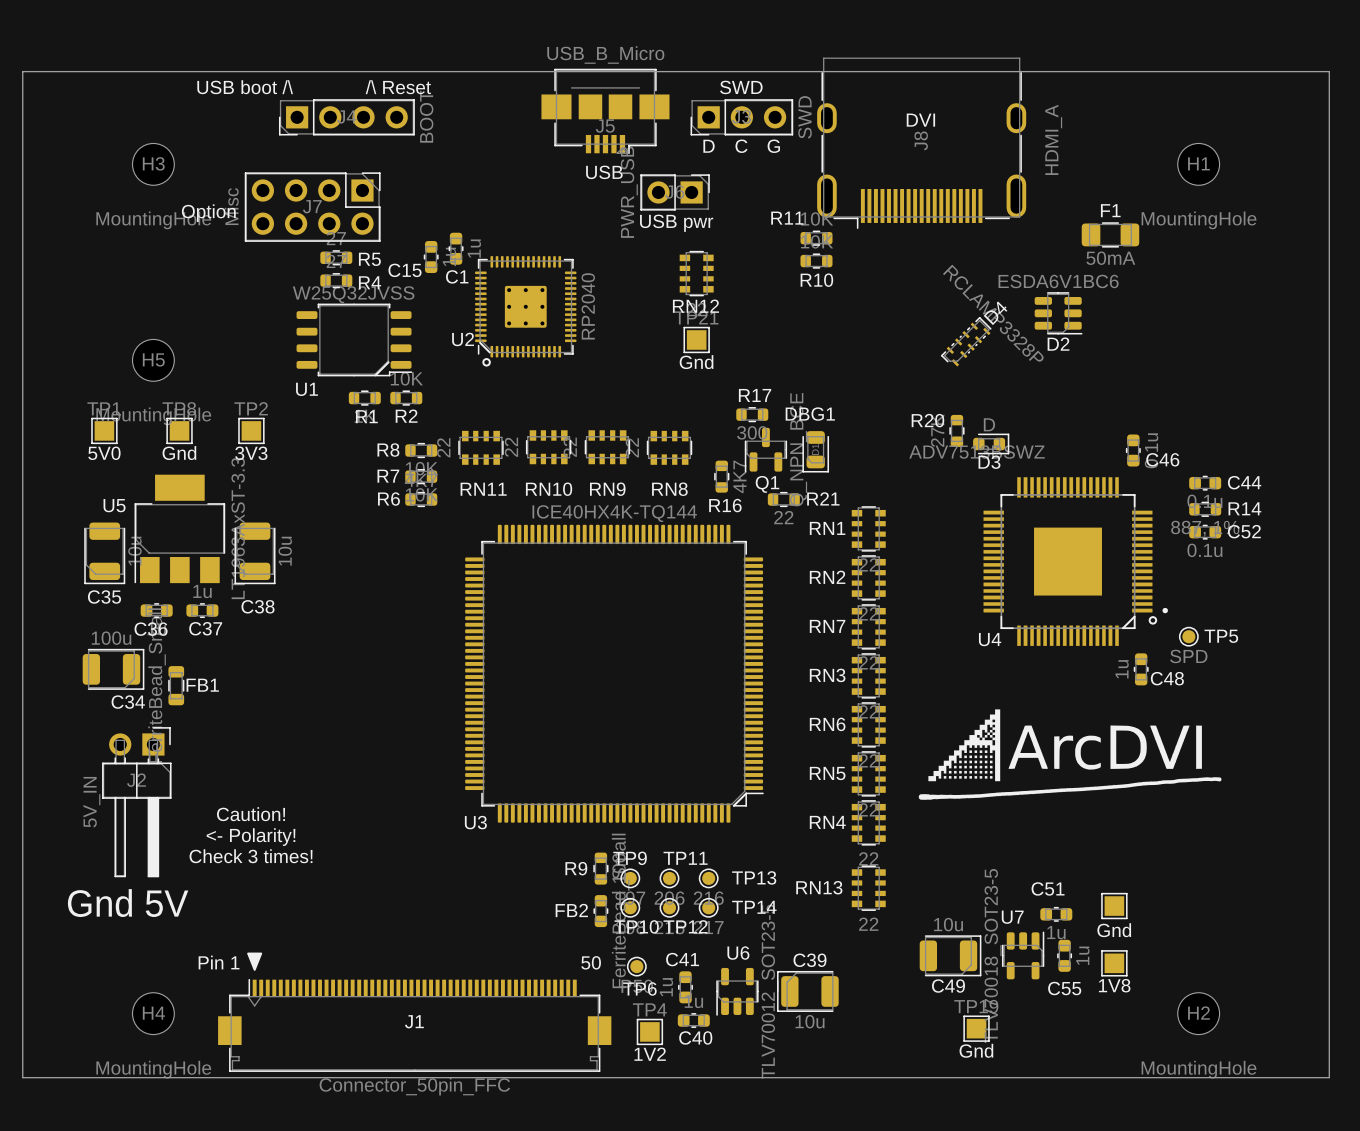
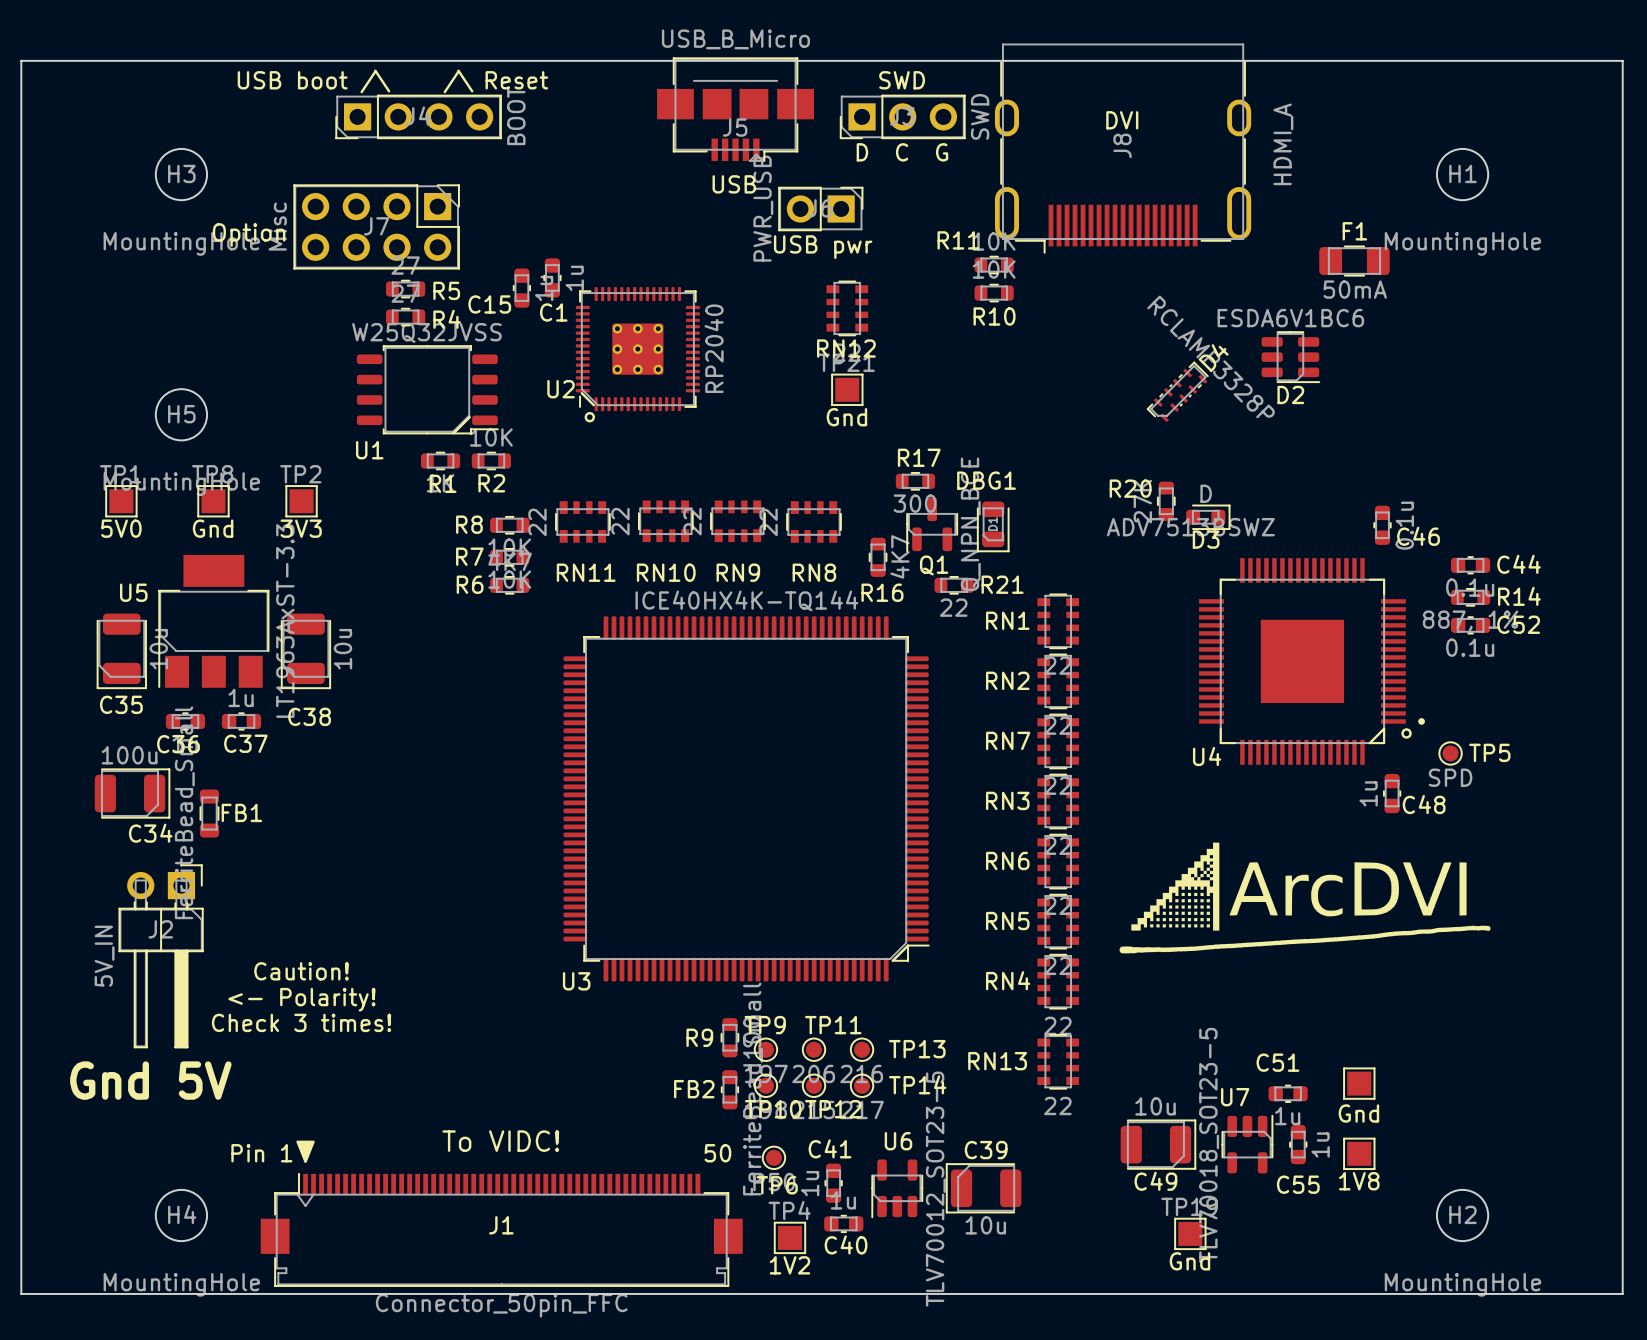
text: none -> To VIDC! (500, 1141)

